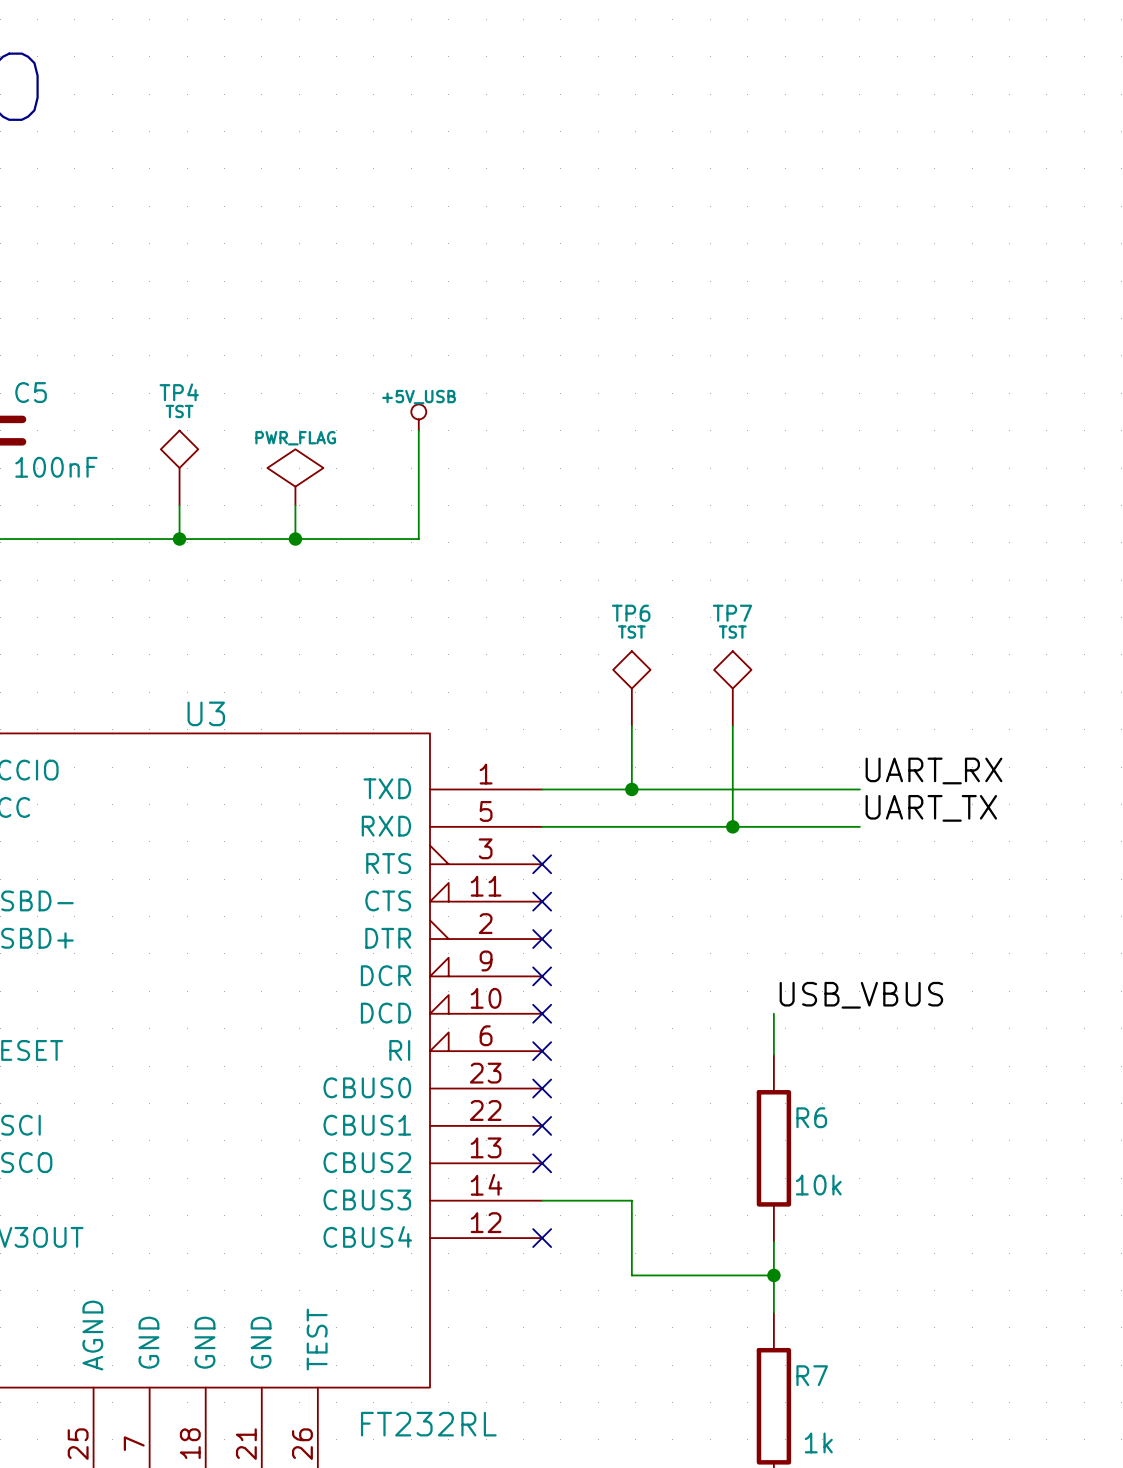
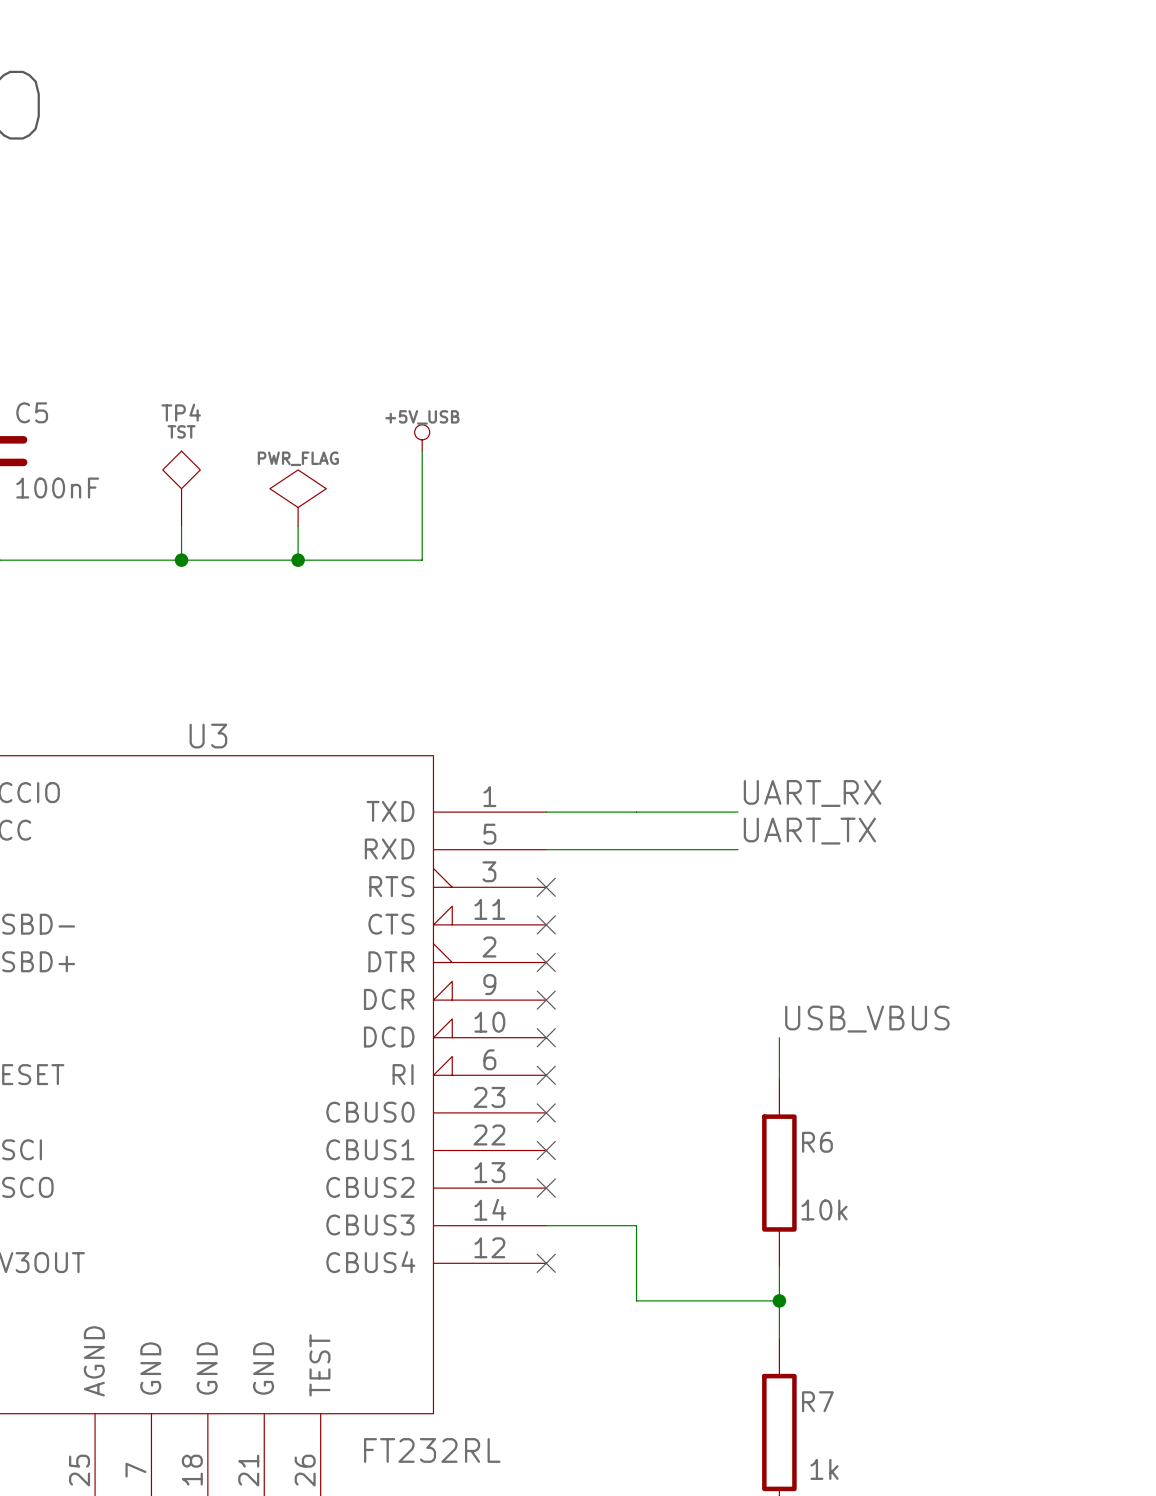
TP6: TST (631, 688) -> none
TP7: TST (732, 688) -> none
wire: (631, 725) (631, 789) -> none
wire: (732, 725) (732, 826) (859, 826) -> none
label position: UART_RX (933, 770) -> UART_RX (812, 793)
junction: (631, 789) -> none
wire: (732, 789) (859, 789) -> none
label position: UART_TX (931, 808) -> UART_TX (809, 831)
junction: (732, 826) -> none

